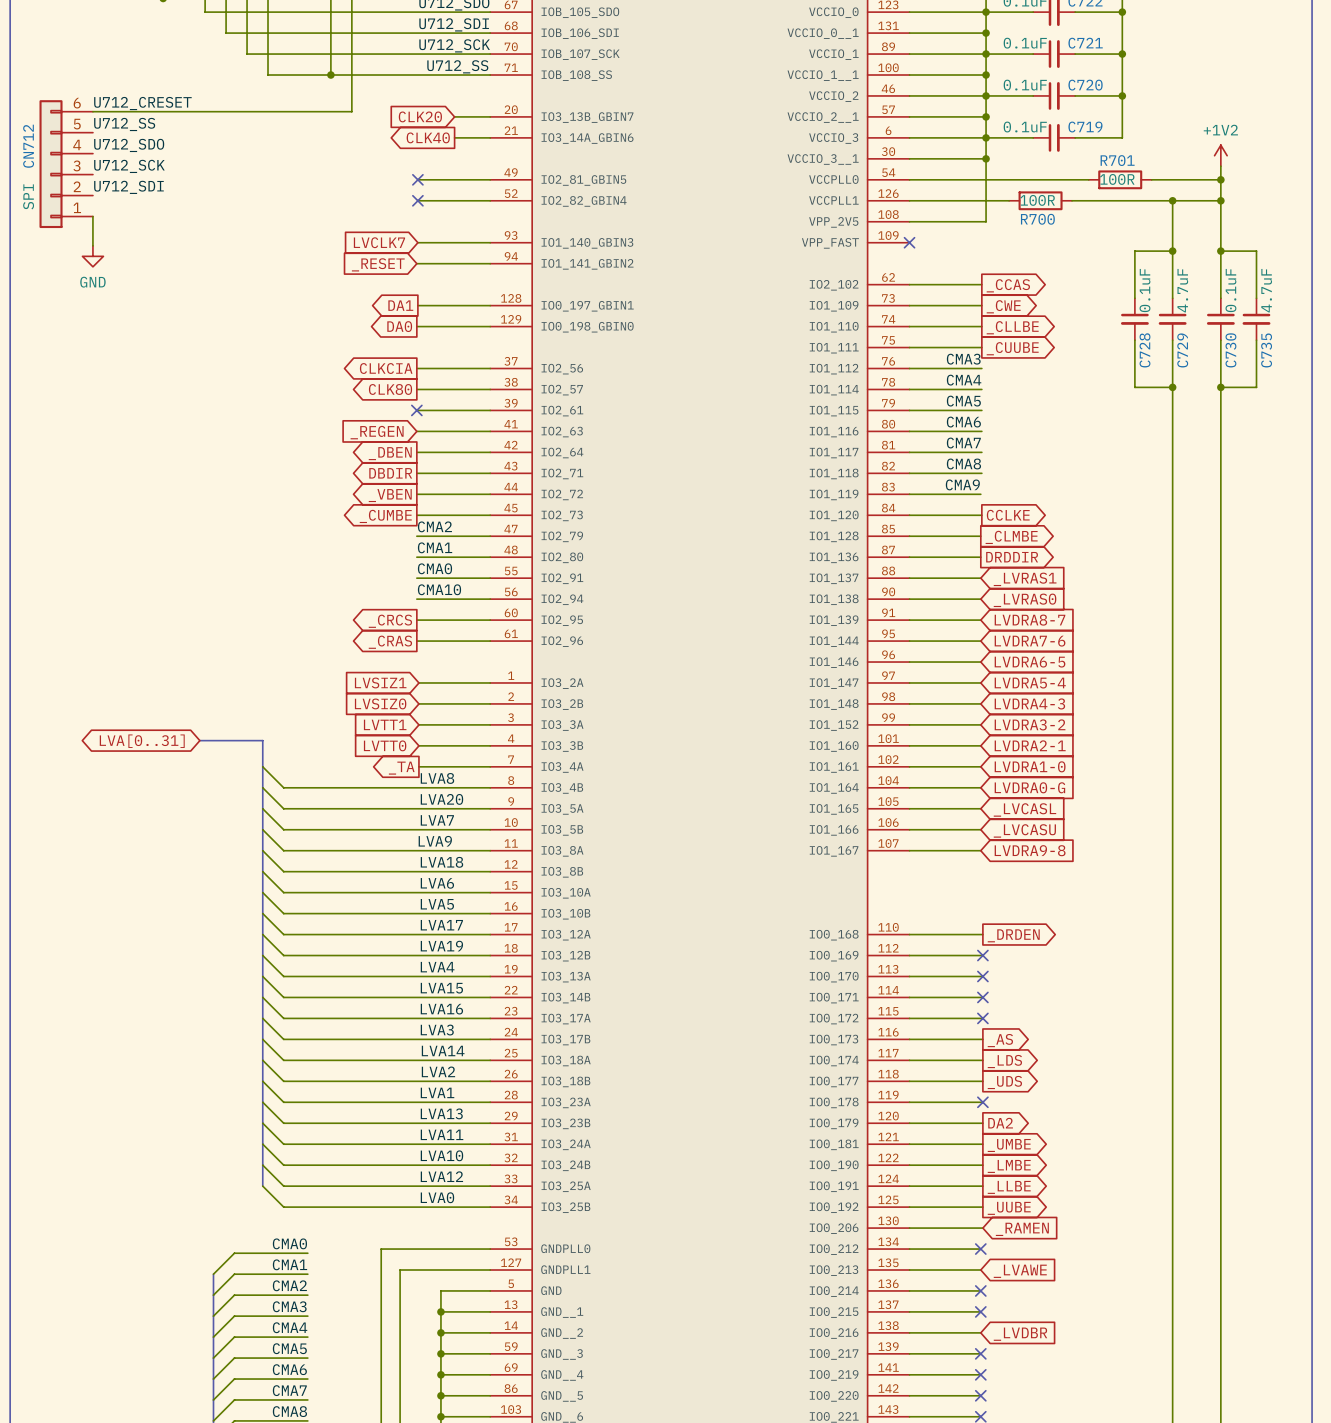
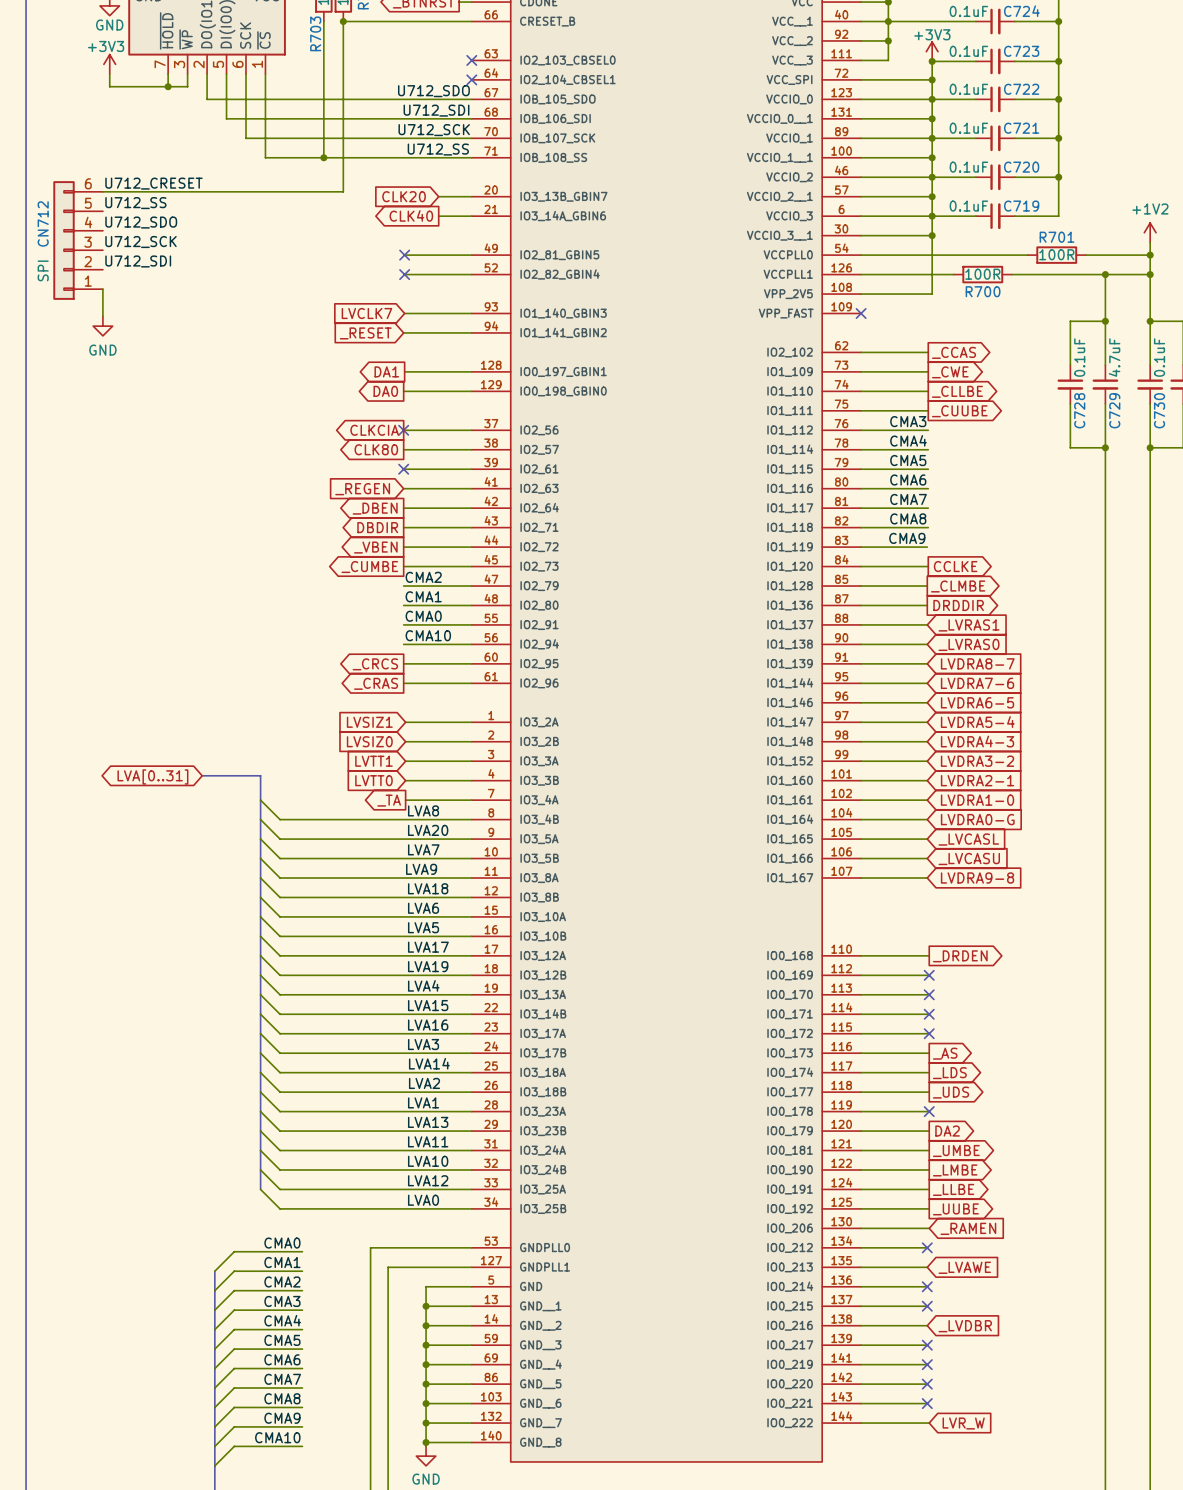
no-connect mark: none -> (403, 430)

